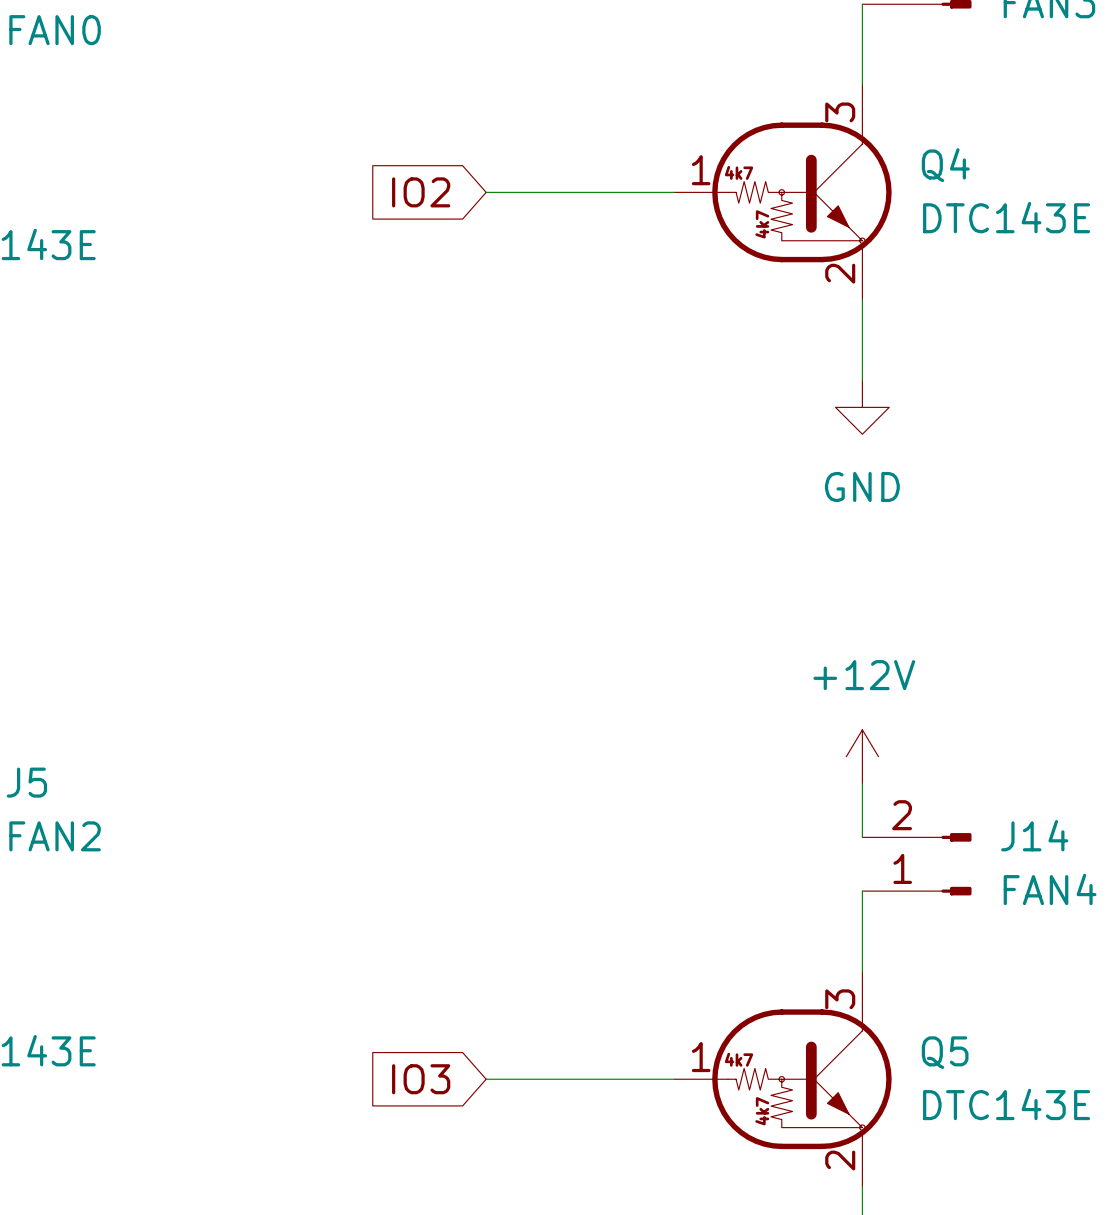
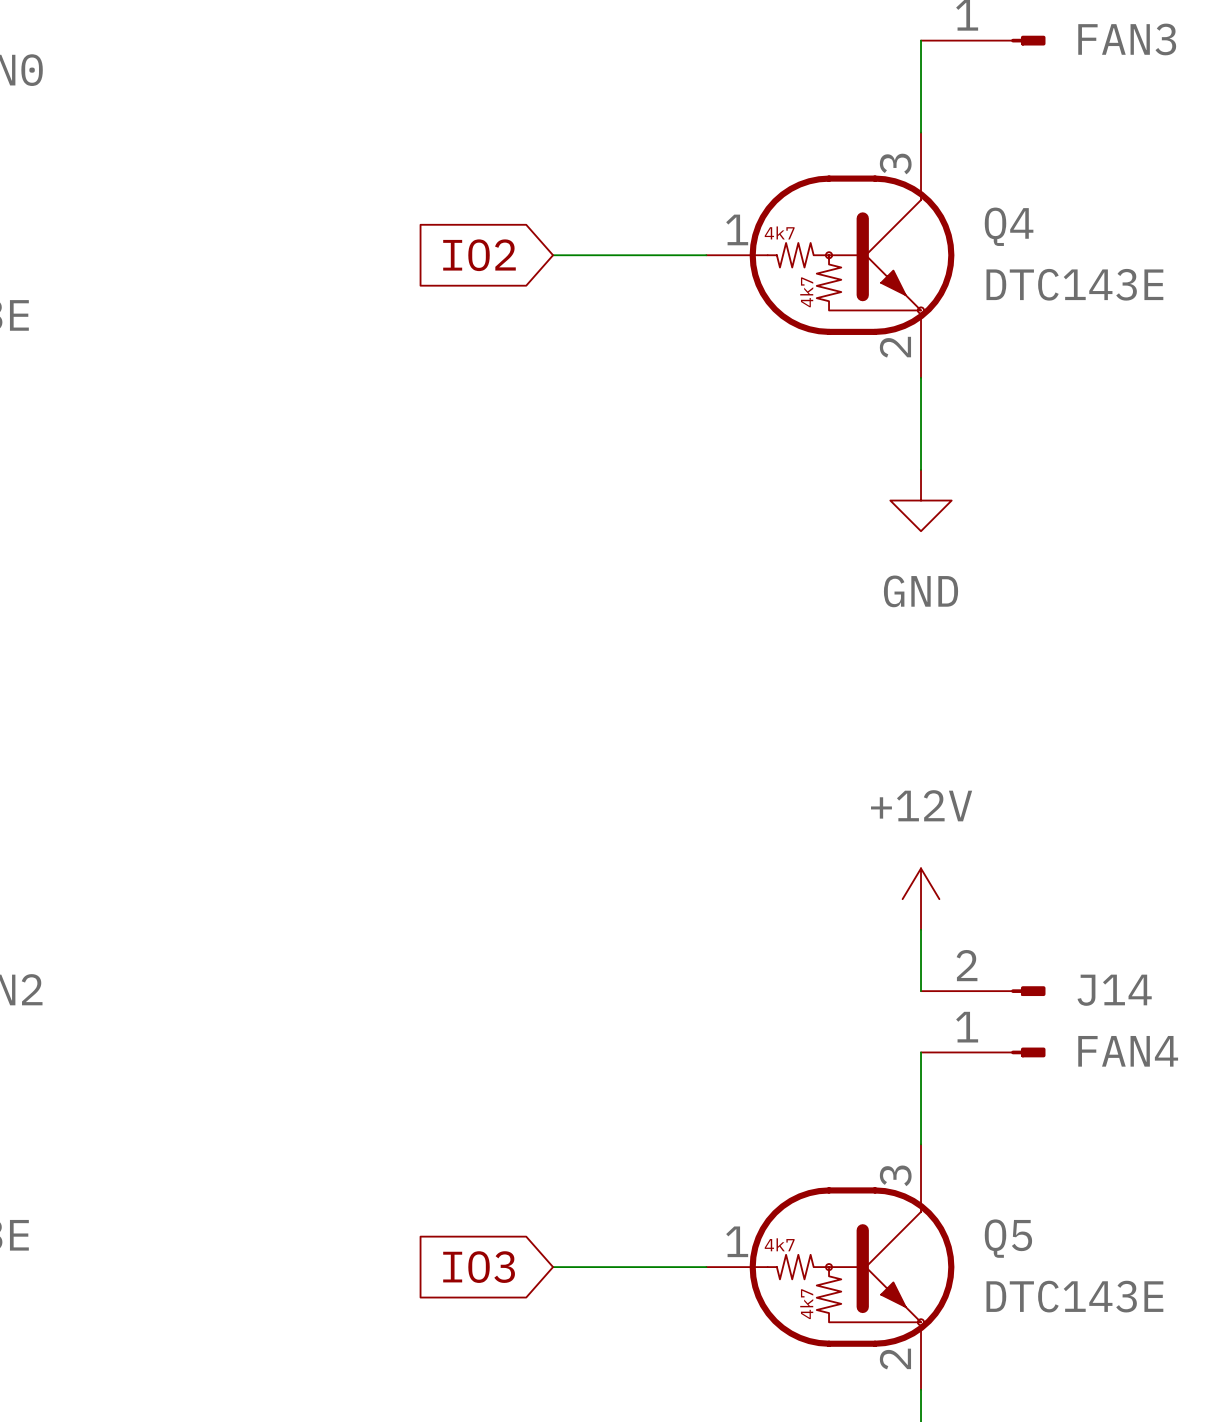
global label position: IO2 (421, 192) -> IO2 (479, 255)
wire: (486, 192) (539, 192) -> none
global label position: IO3 (421, 1079) -> IO3 (479, 1267)
wire: (486, 1079) (539, 1079) -> none

